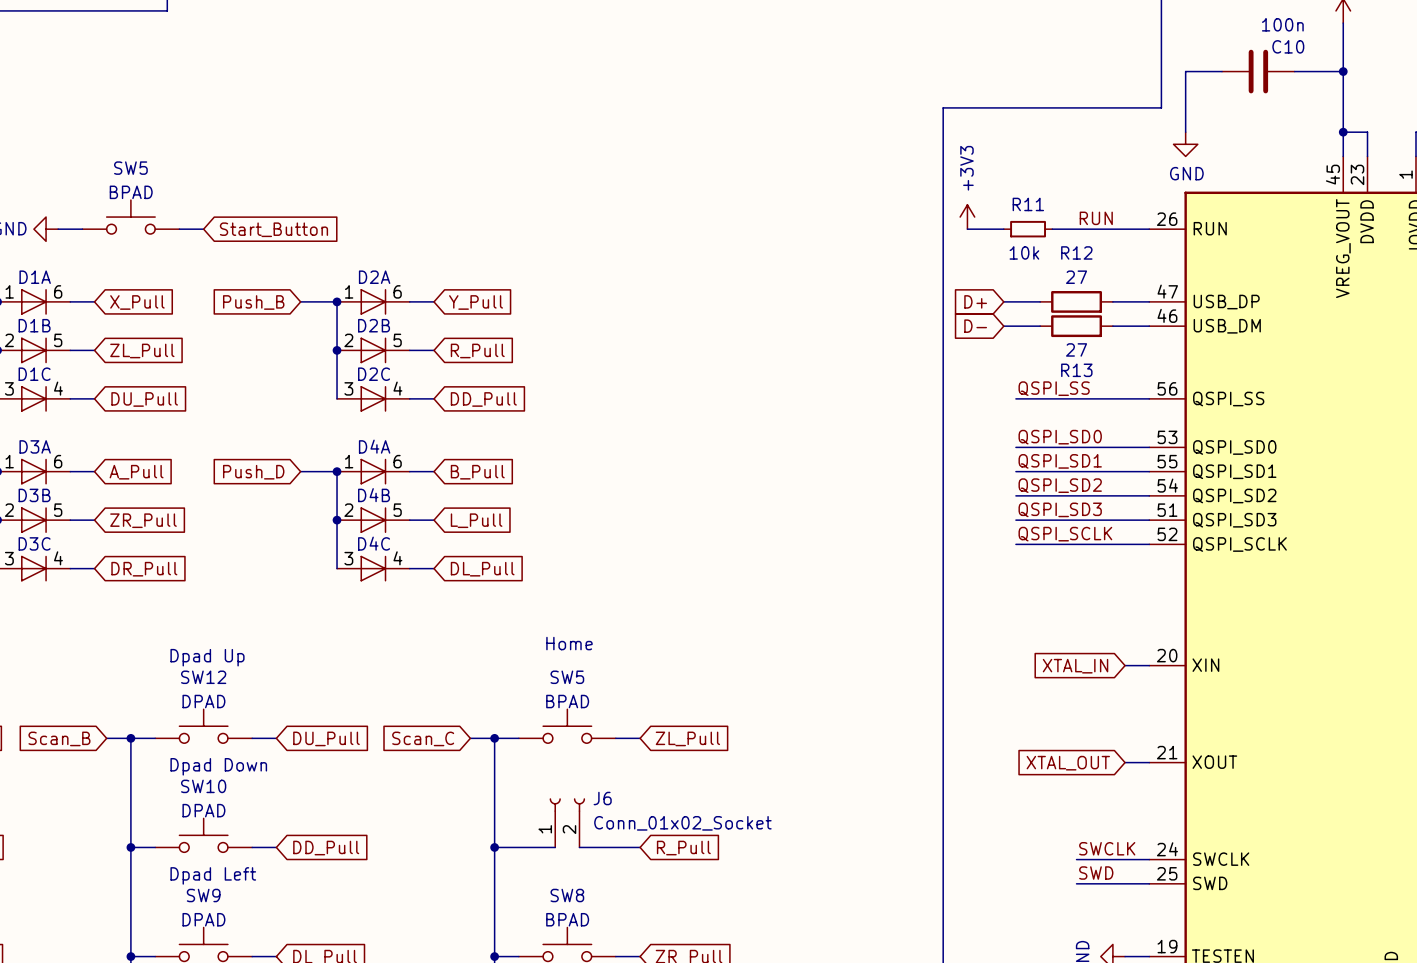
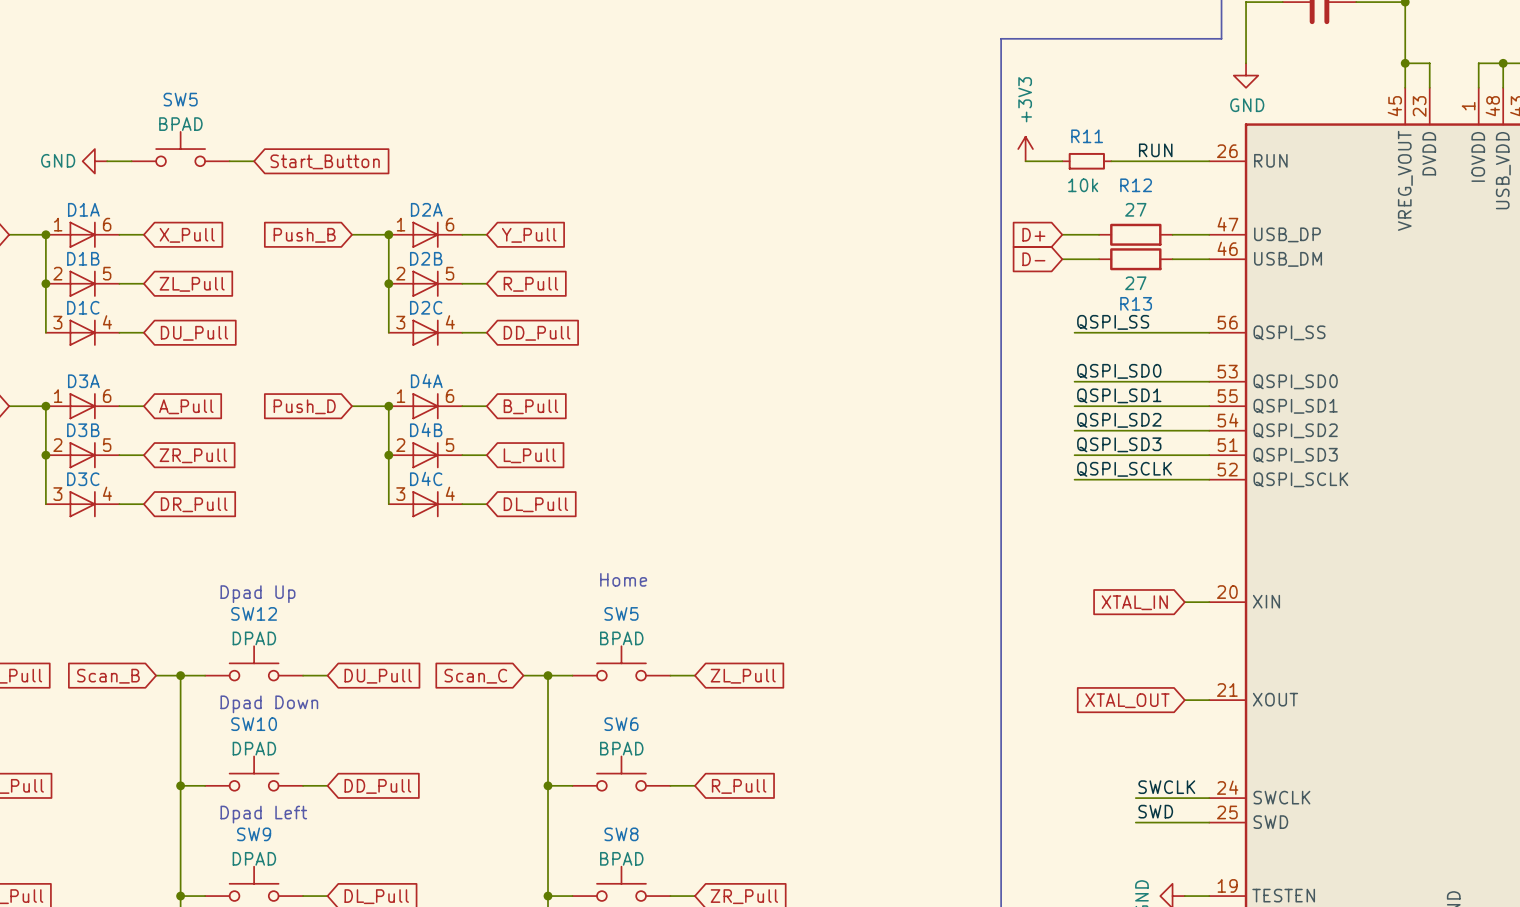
J6: Conn_01x02_Socket (567, 822) -> none
SW6: none -> BPAD (621, 773)

